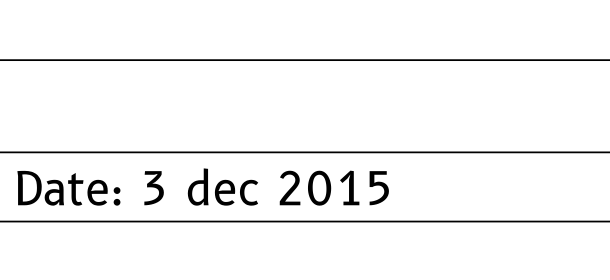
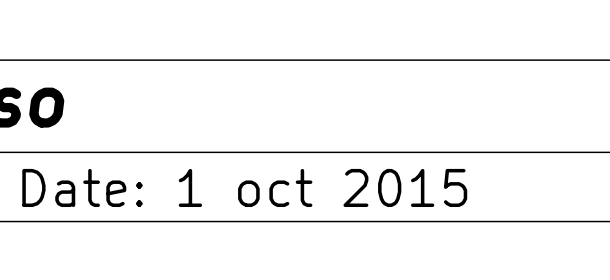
title block: Date: 3 dec 2015 (203, 187) -> Date: 1 oct 2015 (244, 187)

